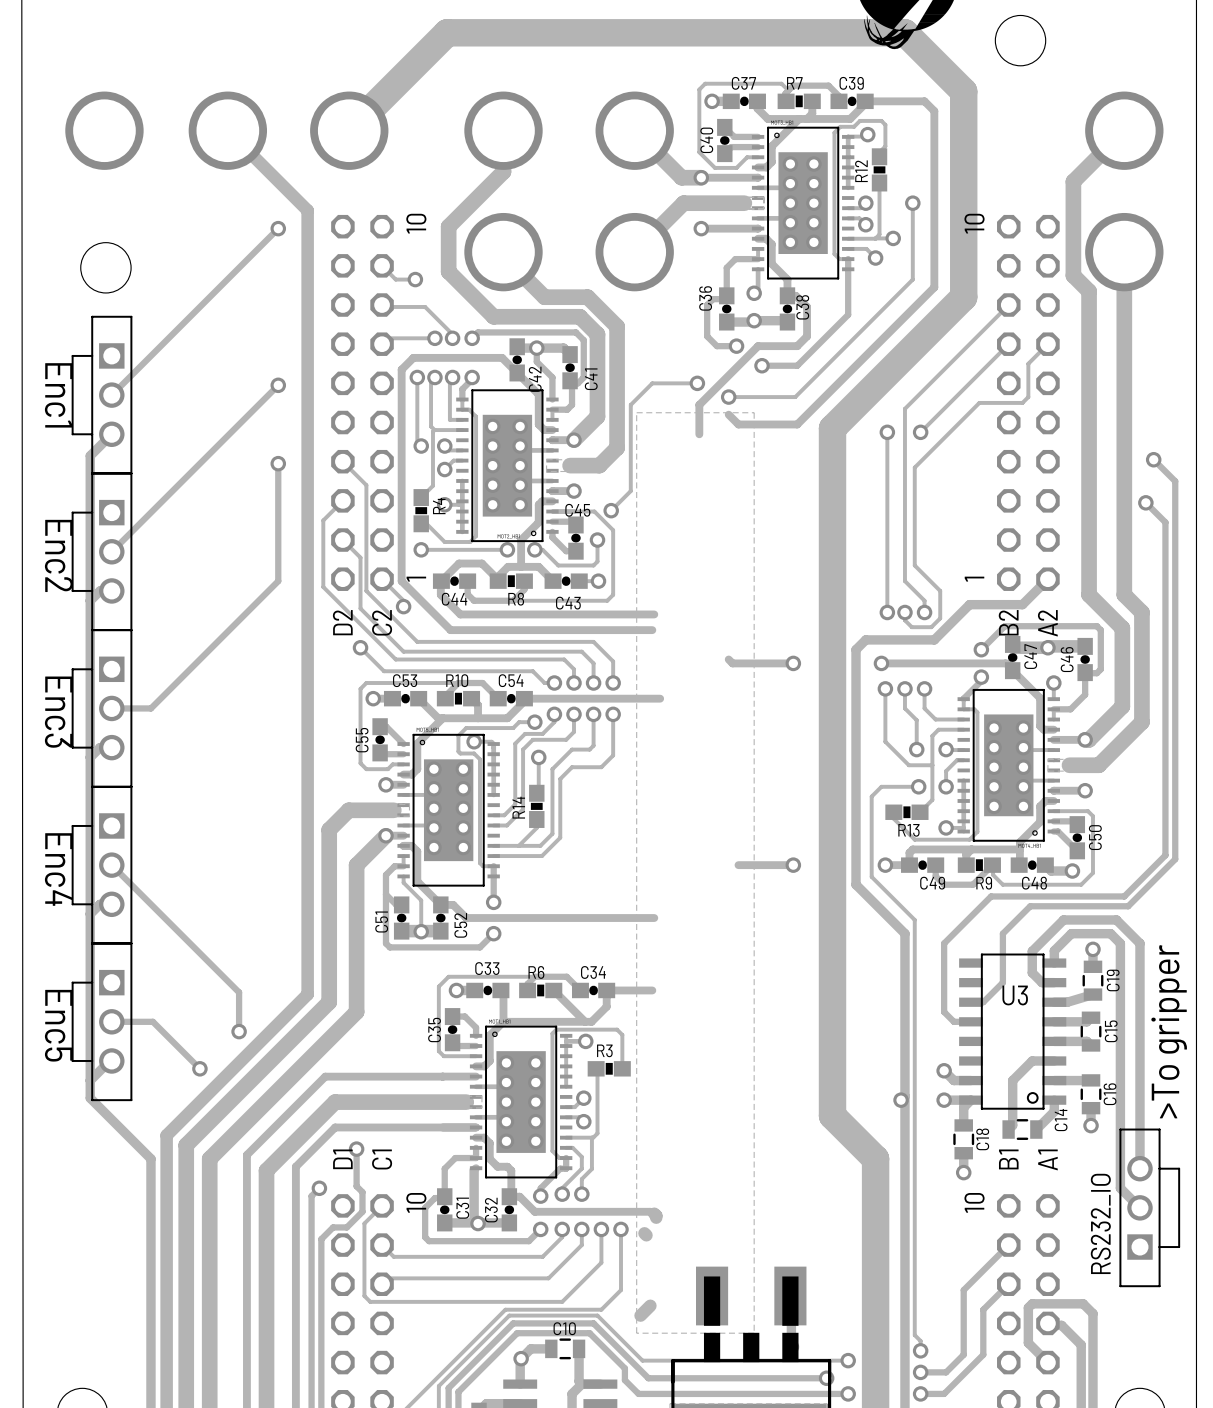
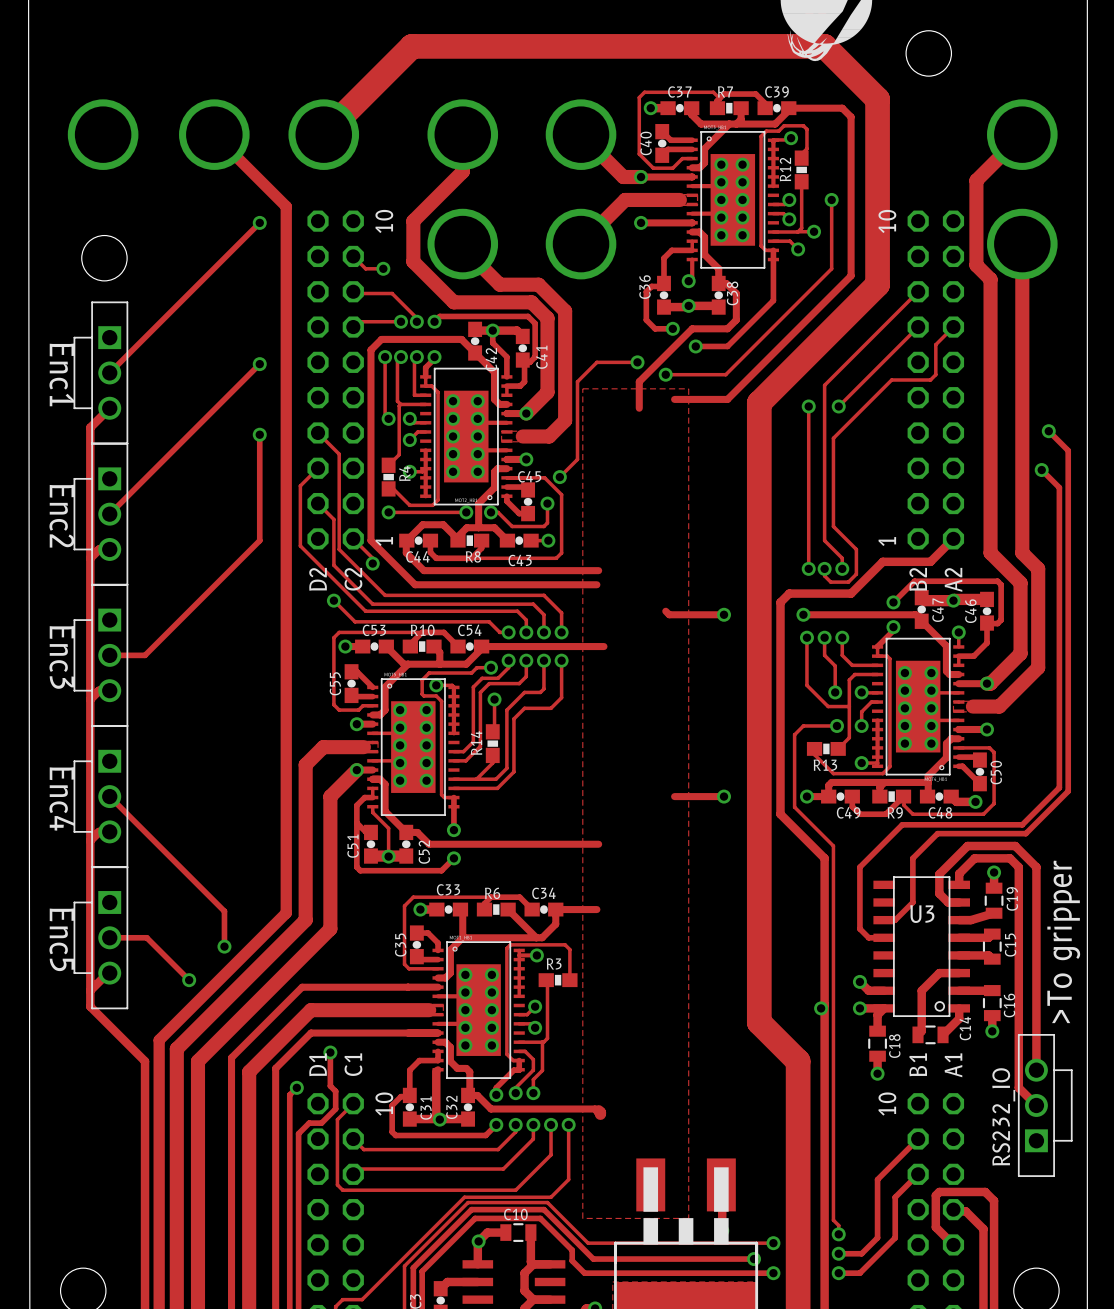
track: (728, 414) (738, 424) -> none
track: (644, 1233) (646, 1235) -> none
track: (650, 1305) (640, 1315) -> none

